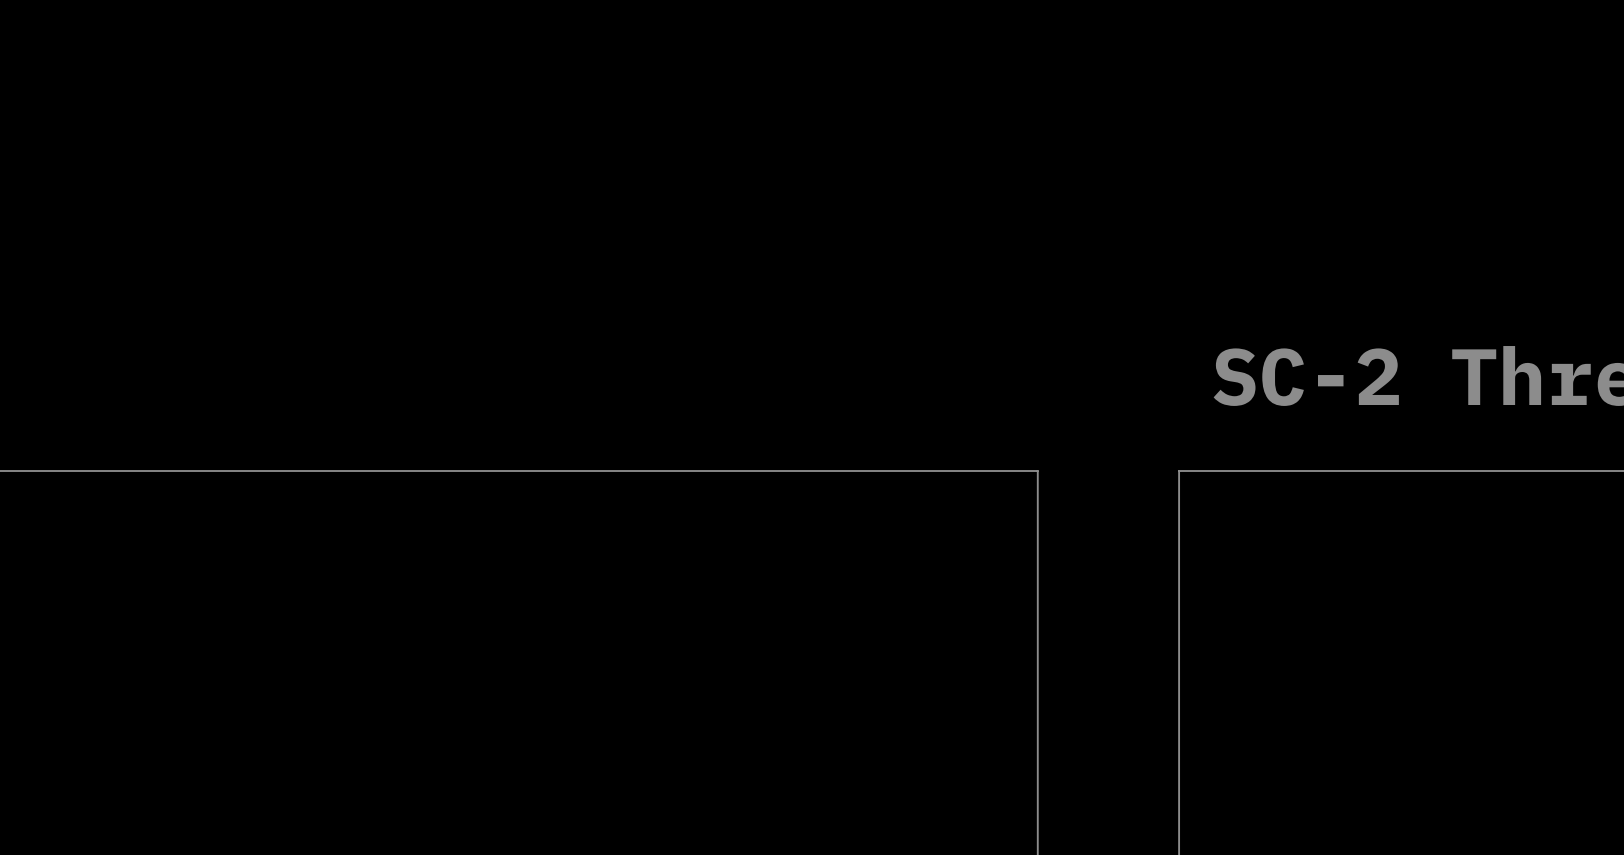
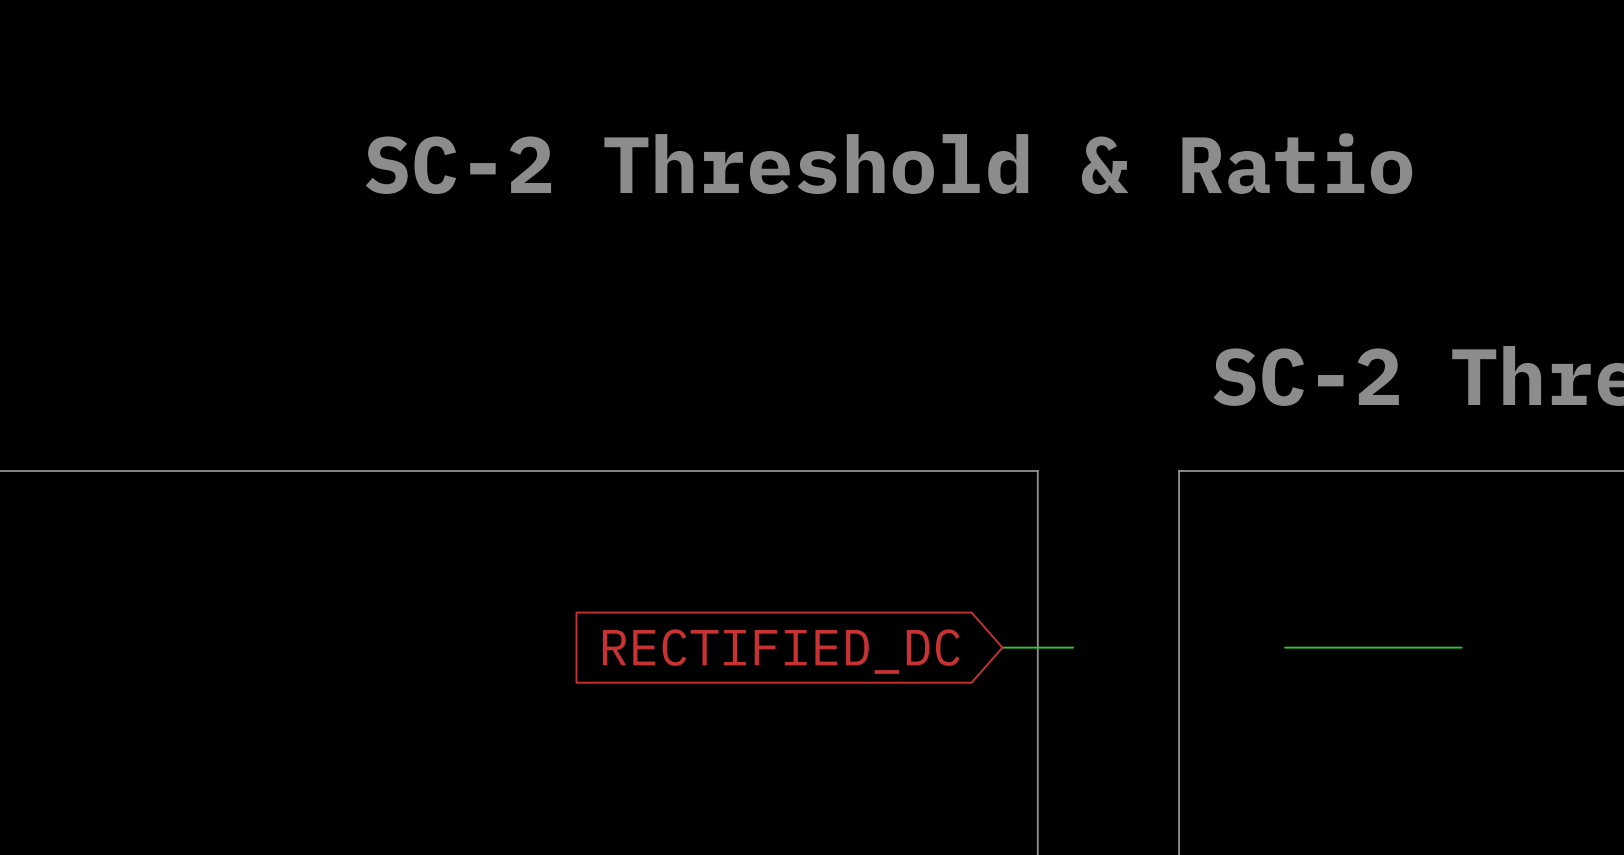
text: none -> SC-2 Threshold & Ratio (889, 163)
wire: none -> (1002, 647) (1073, 647)
wire: none -> (1285, 647) (1461, 647)
global label: none -> RECTIFIED_DC (781, 651)

